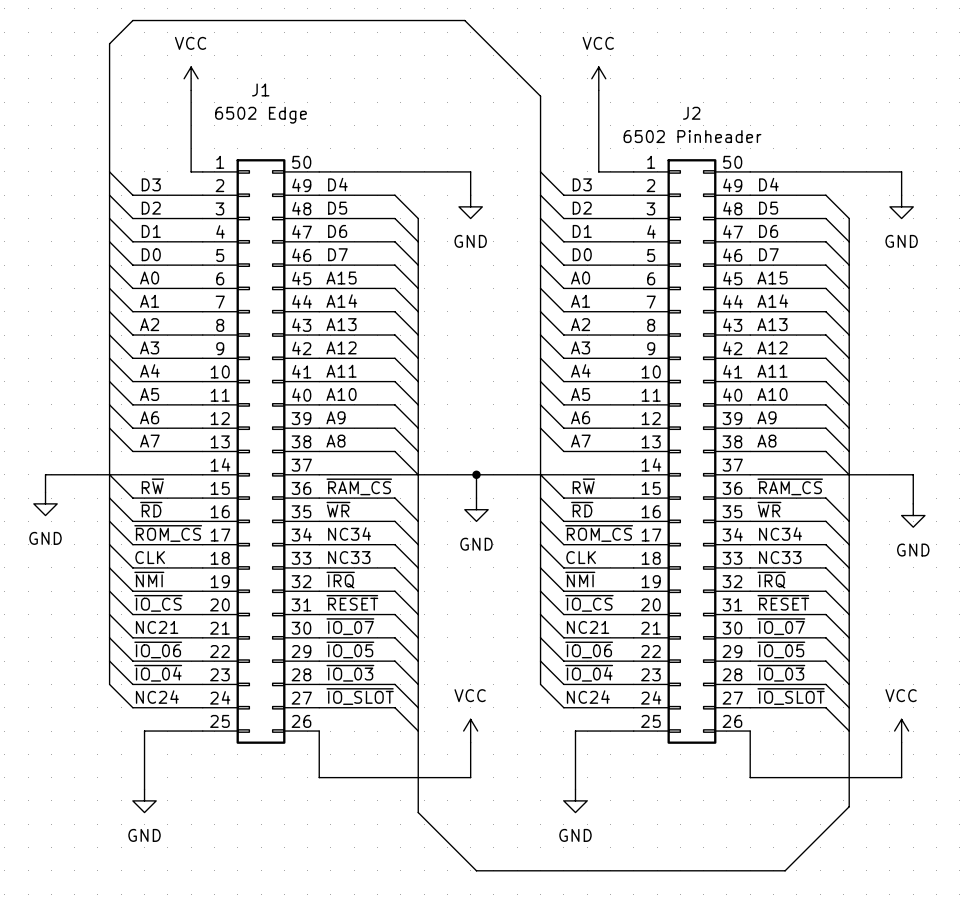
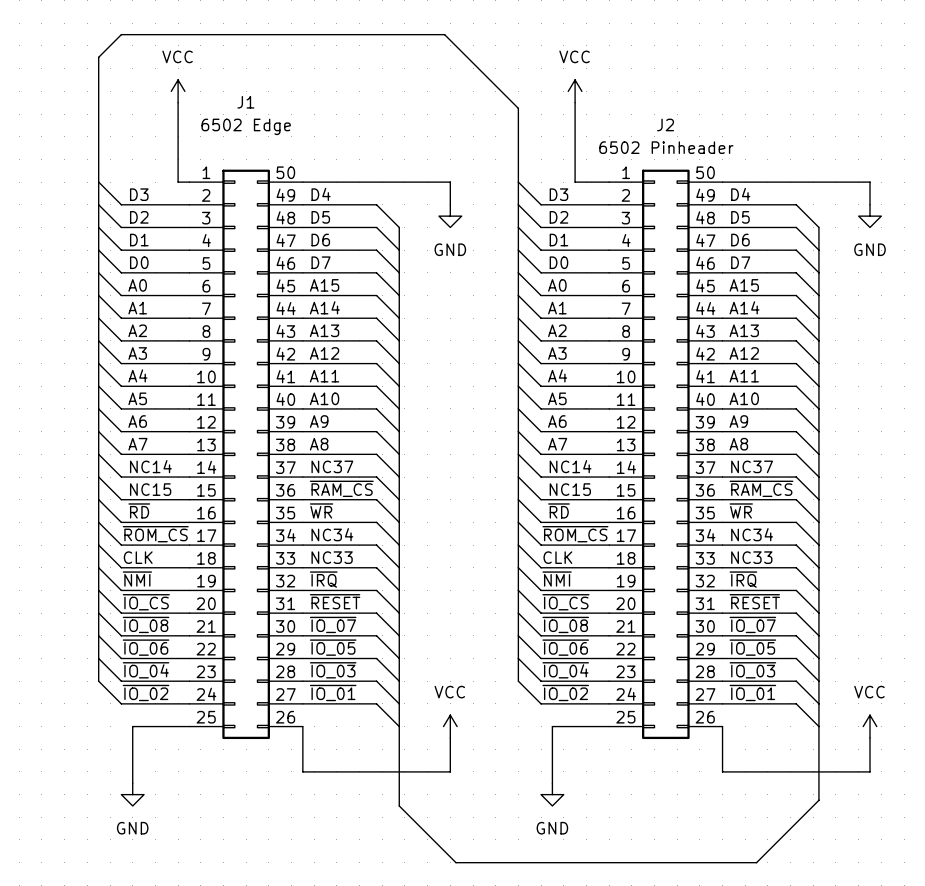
label: none -> NC14 (150, 466)
label: none -> NC37 (332, 466)
label: none -> NC14 (570, 466)
label: none -> NC37 (752, 466)
wire: (132, 474) (45, 474) (45, 492) -> (121, 477) (98, 454)
wire: (394, 474) (563, 474) -> (518, 454) (541, 477)
wire: none -> (376, 477) (399, 499)
wire: (476, 474) (476, 498) -> none
junction: (476, 474) -> none
wire: (825, 474) (913, 474) (913, 503) -> (796, 477) (818, 499)
label: R~{W} (152, 486) -> NC15 (150, 489)
label: R~{W} (583, 486) -> NC15 (570, 489)
power symbol: GND (45, 503) -> none
power symbol: GND (476, 509) -> none
power symbol: GND (913, 515) -> none
label: NC21 (157, 627) -> ~{IO_08} (146, 624)
label: NC21 (588, 627) -> ~{IO_08} (565, 624)
label: ~{IO_SLOT} (360, 696) -> ~{IO_01} (333, 692)
label: ~{IO_SLOT} (791, 696) -> ~{IO_01} (752, 692)
label: NC24 (157, 697) -> ~{IO_02} (146, 692)
label: NC24 (588, 697) -> ~{IO_02} (565, 692)

